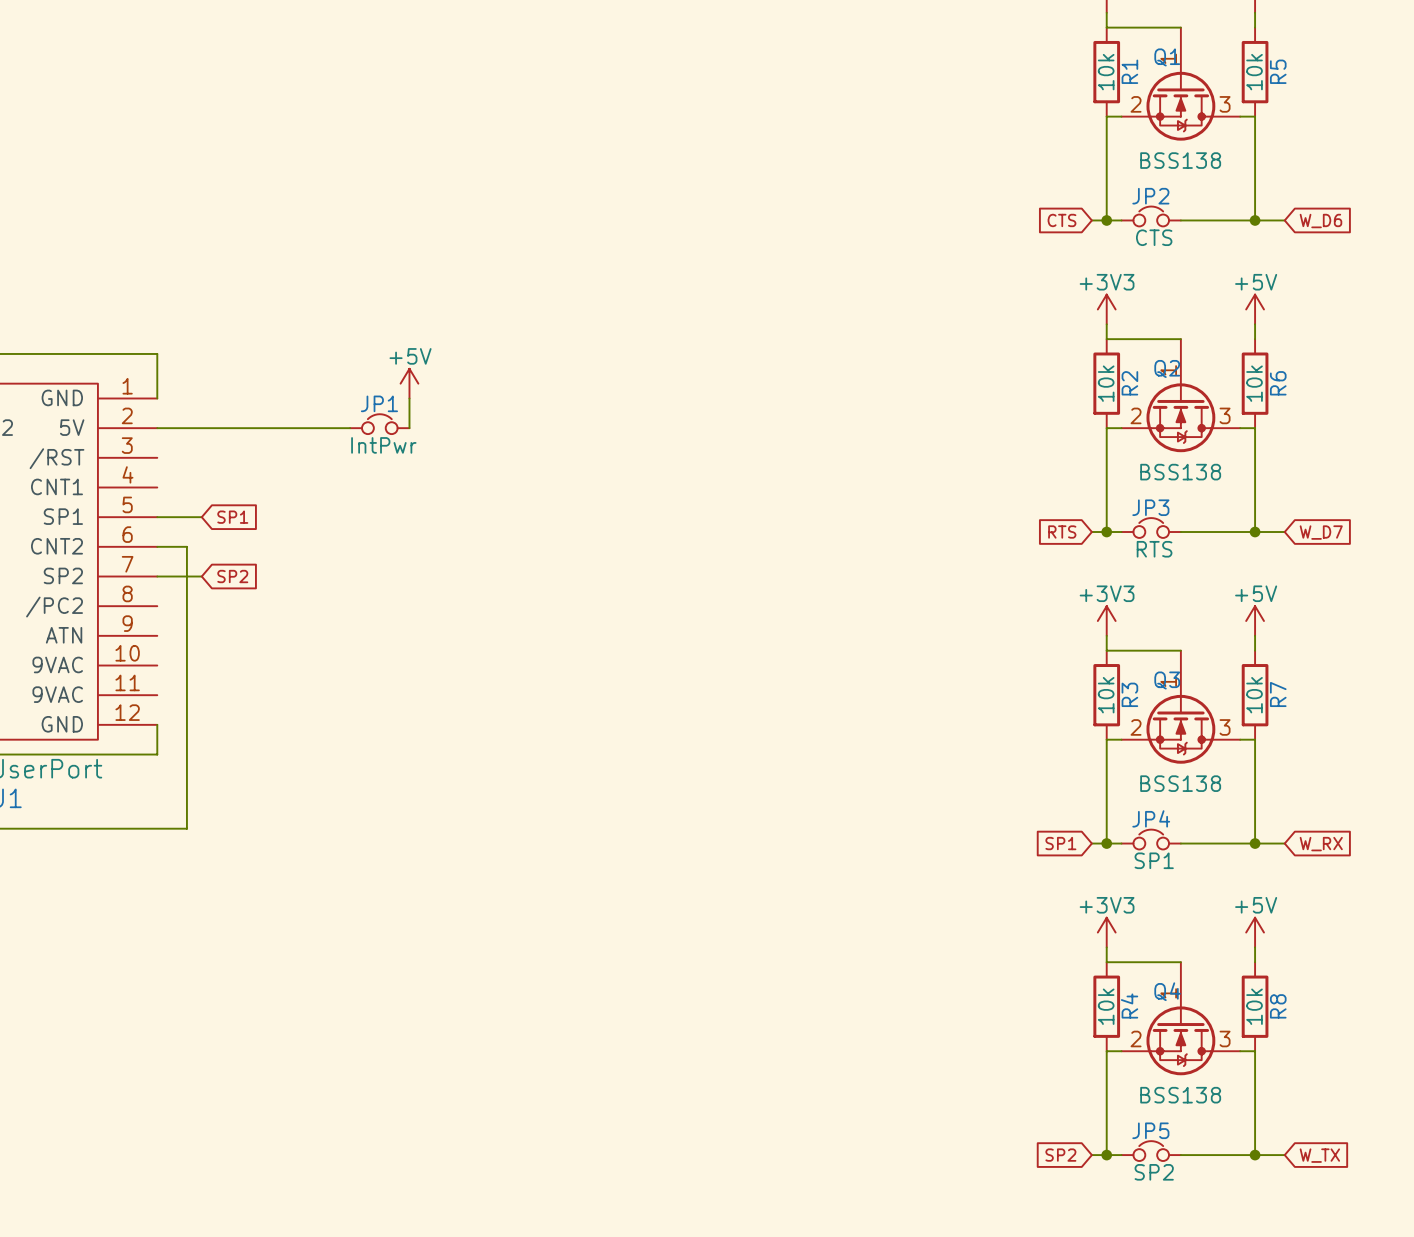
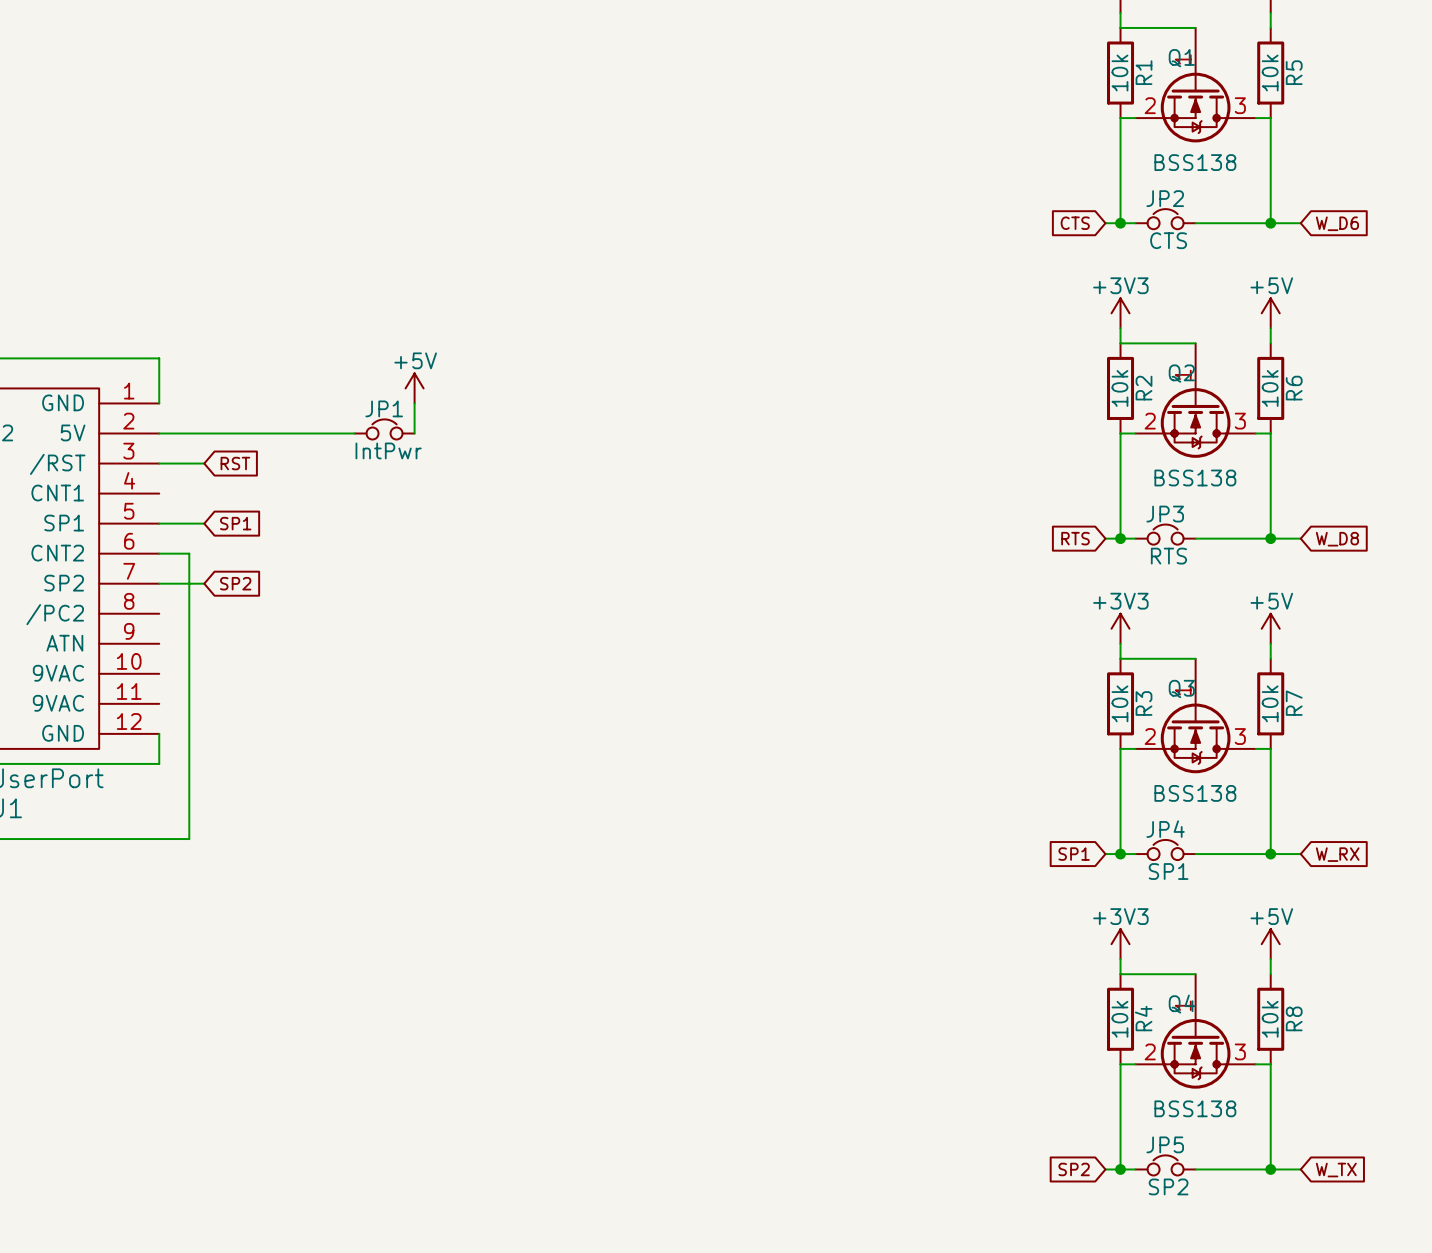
wire: none -> (159, 463) (204, 463)
global label: none -> RST (235, 463)
global label: W_D7 (1321, 532) -> W_D8 (1337, 539)

